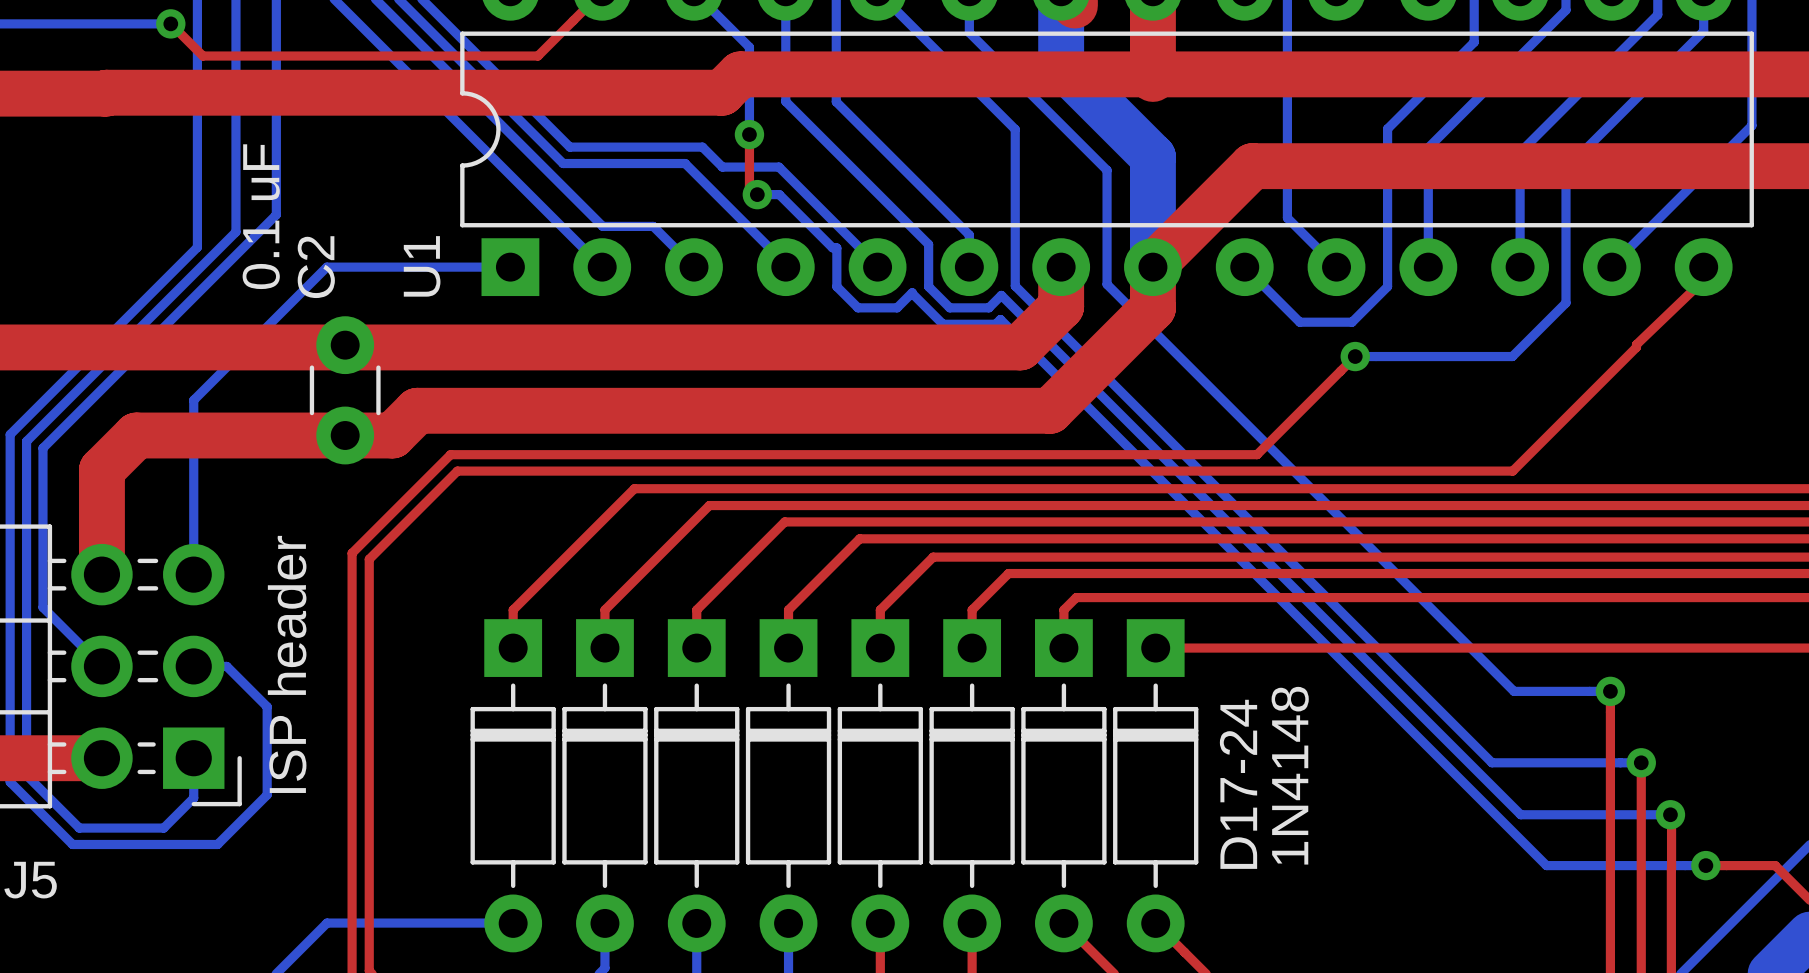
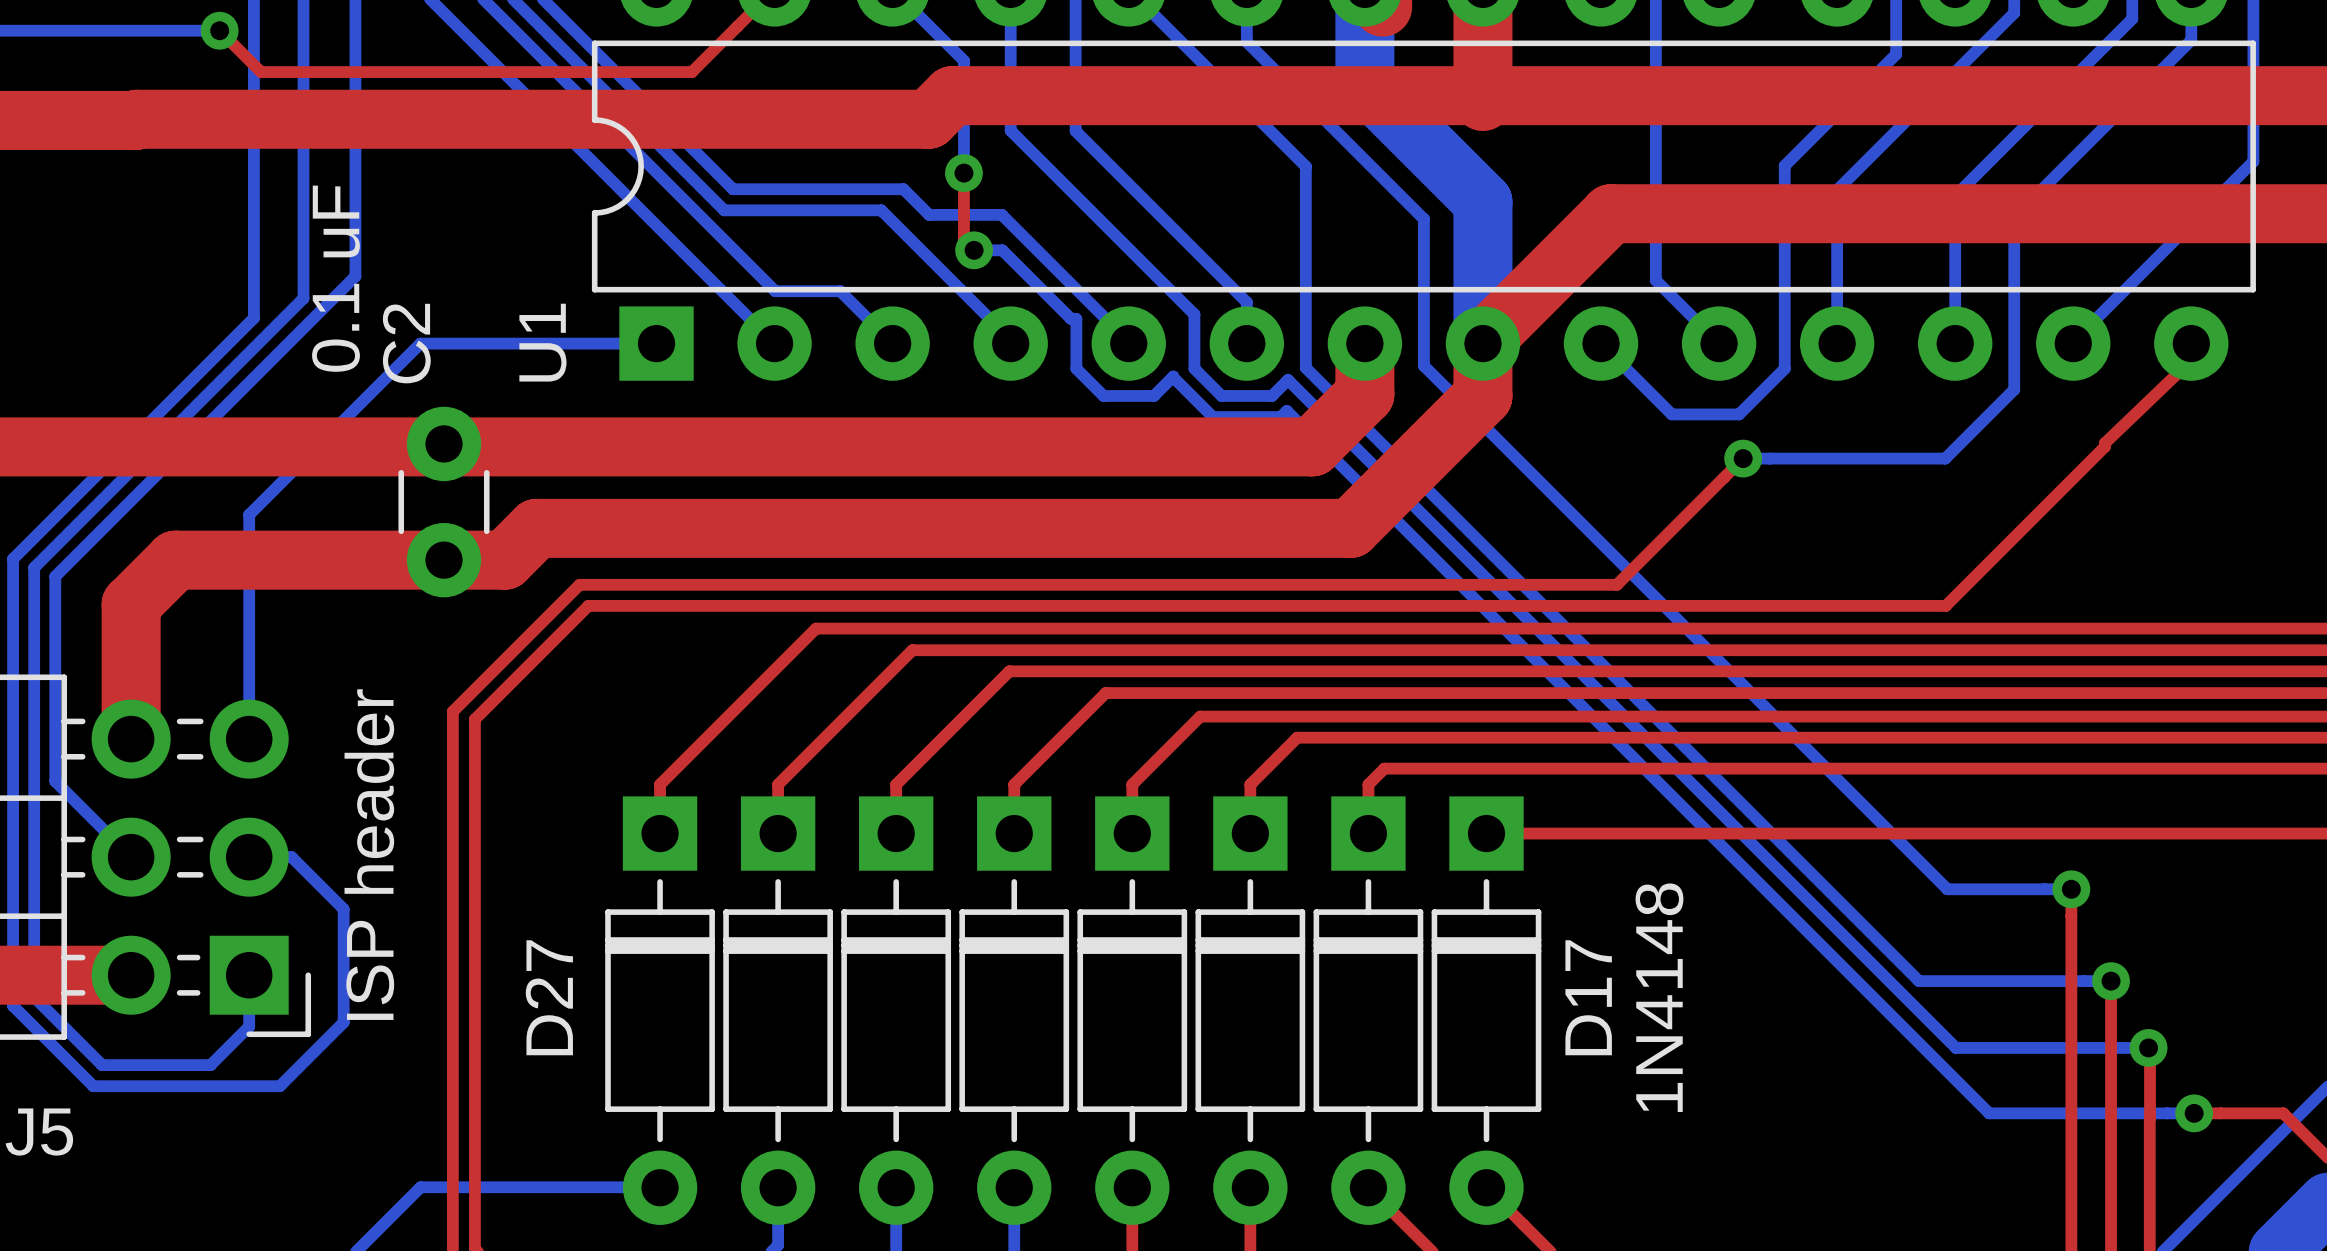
D27 name: none -> D27 (549, 997)
D17 name: none -> D17 (1588, 997)
text: D17-24 (1238, 784) -> none

